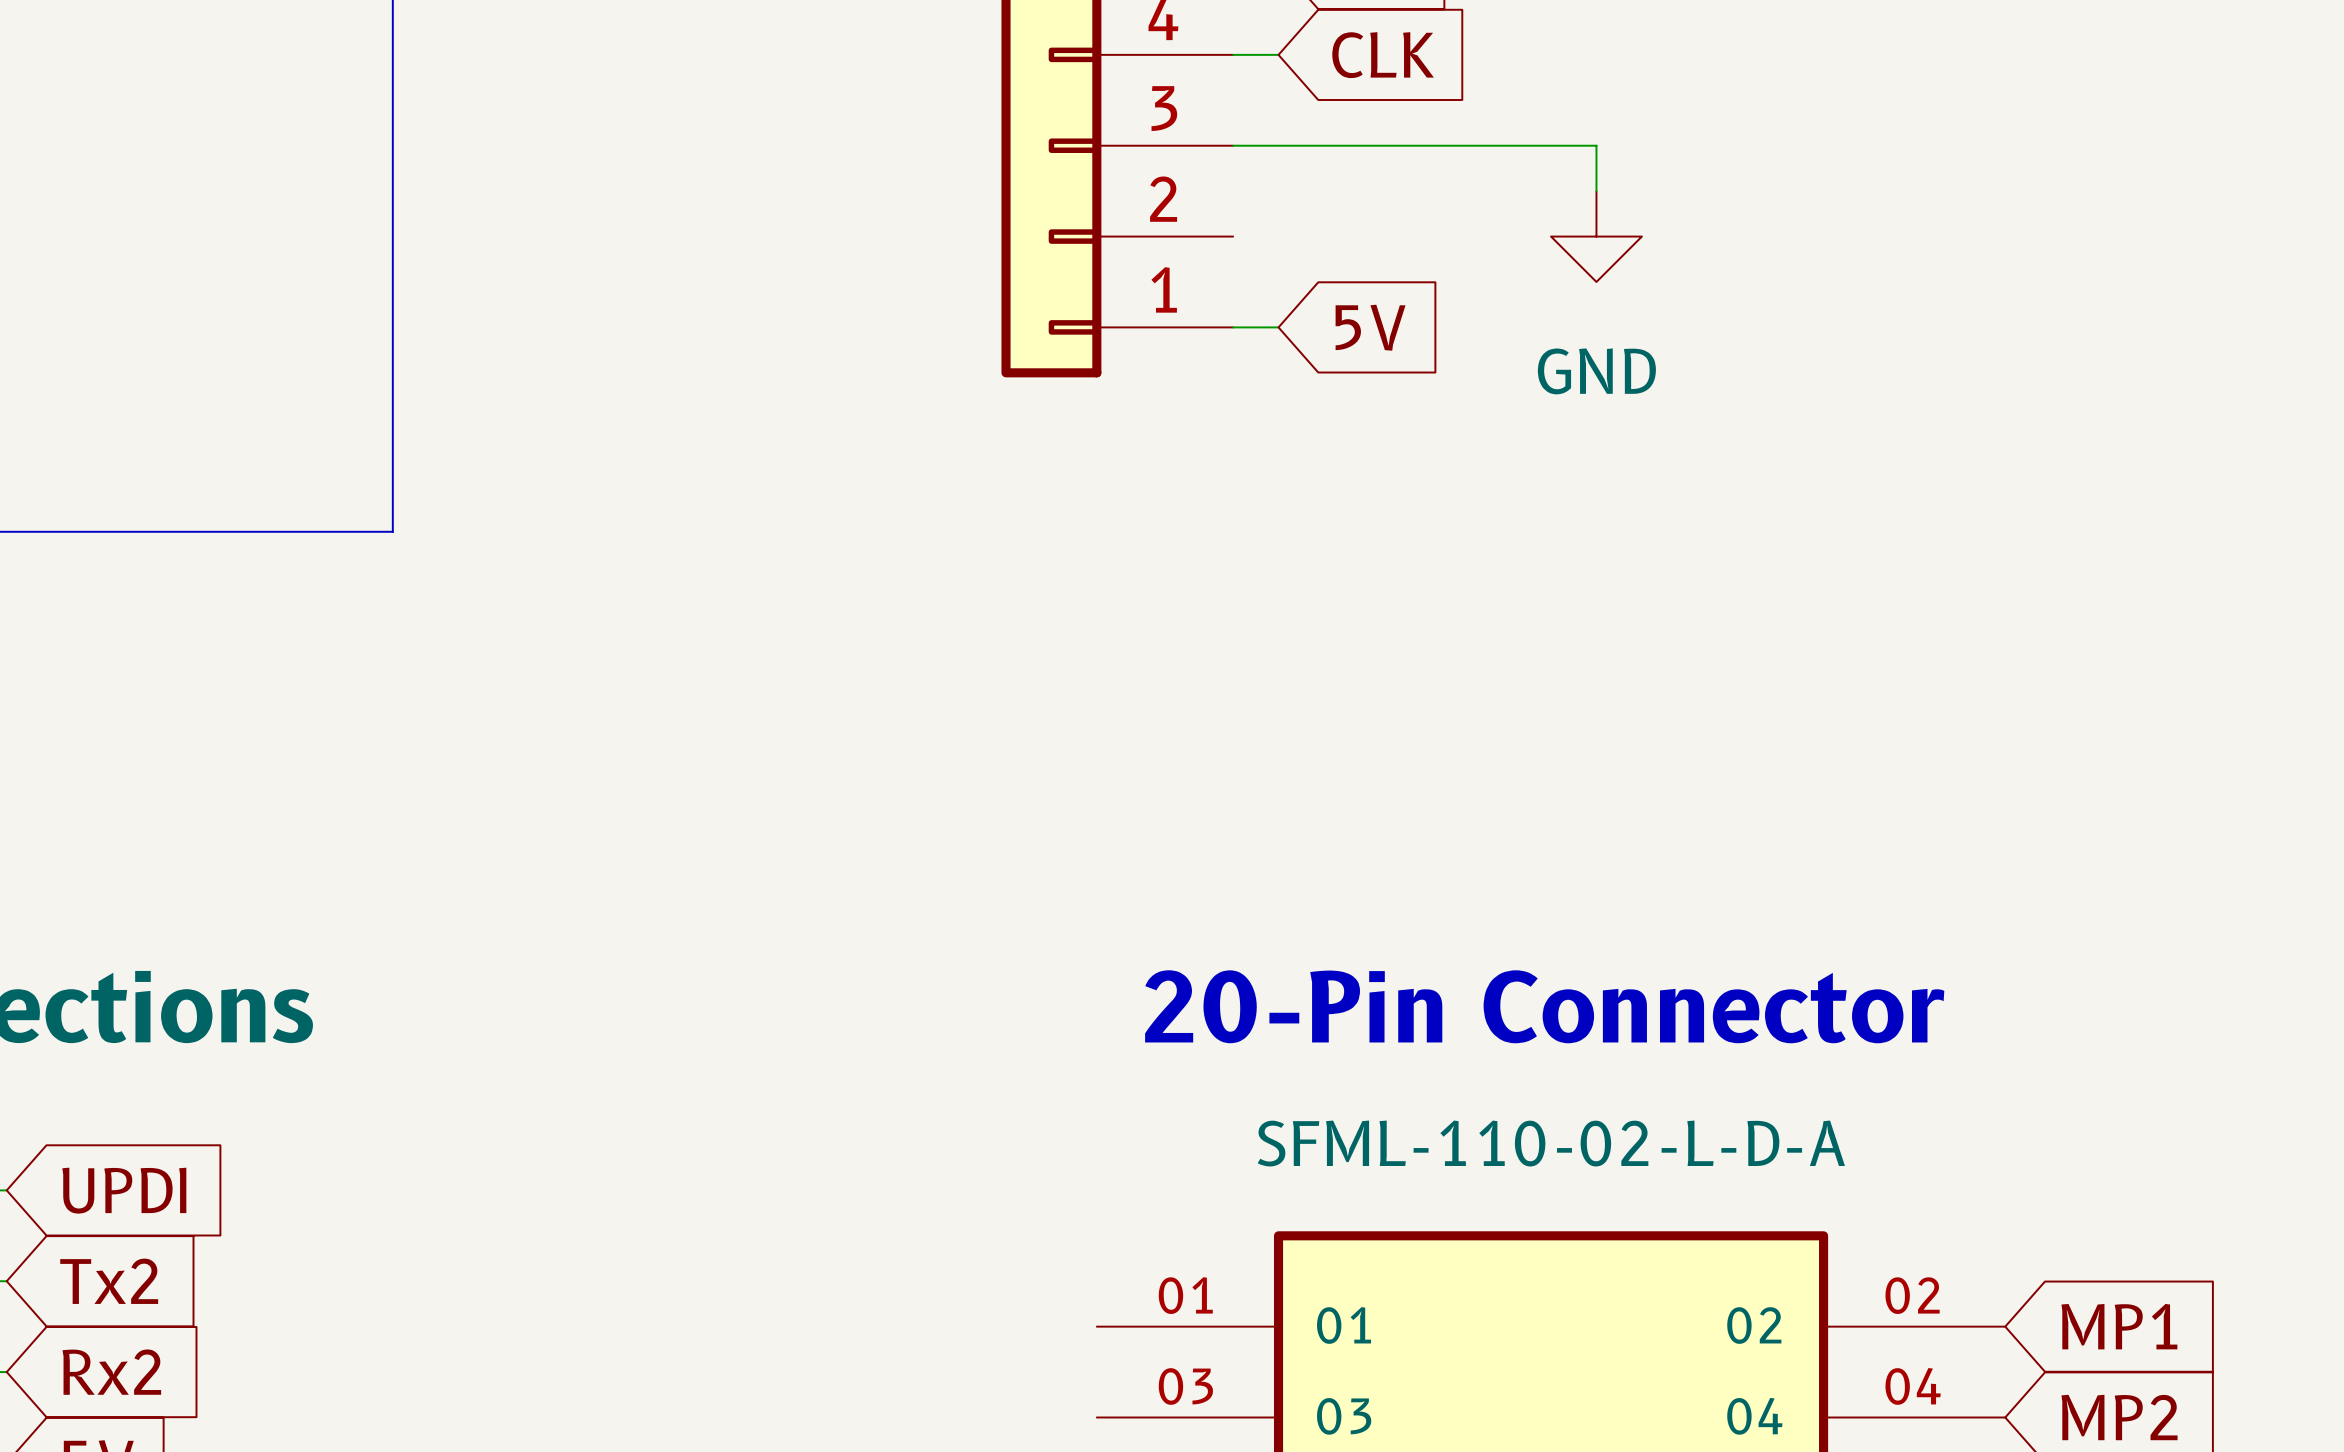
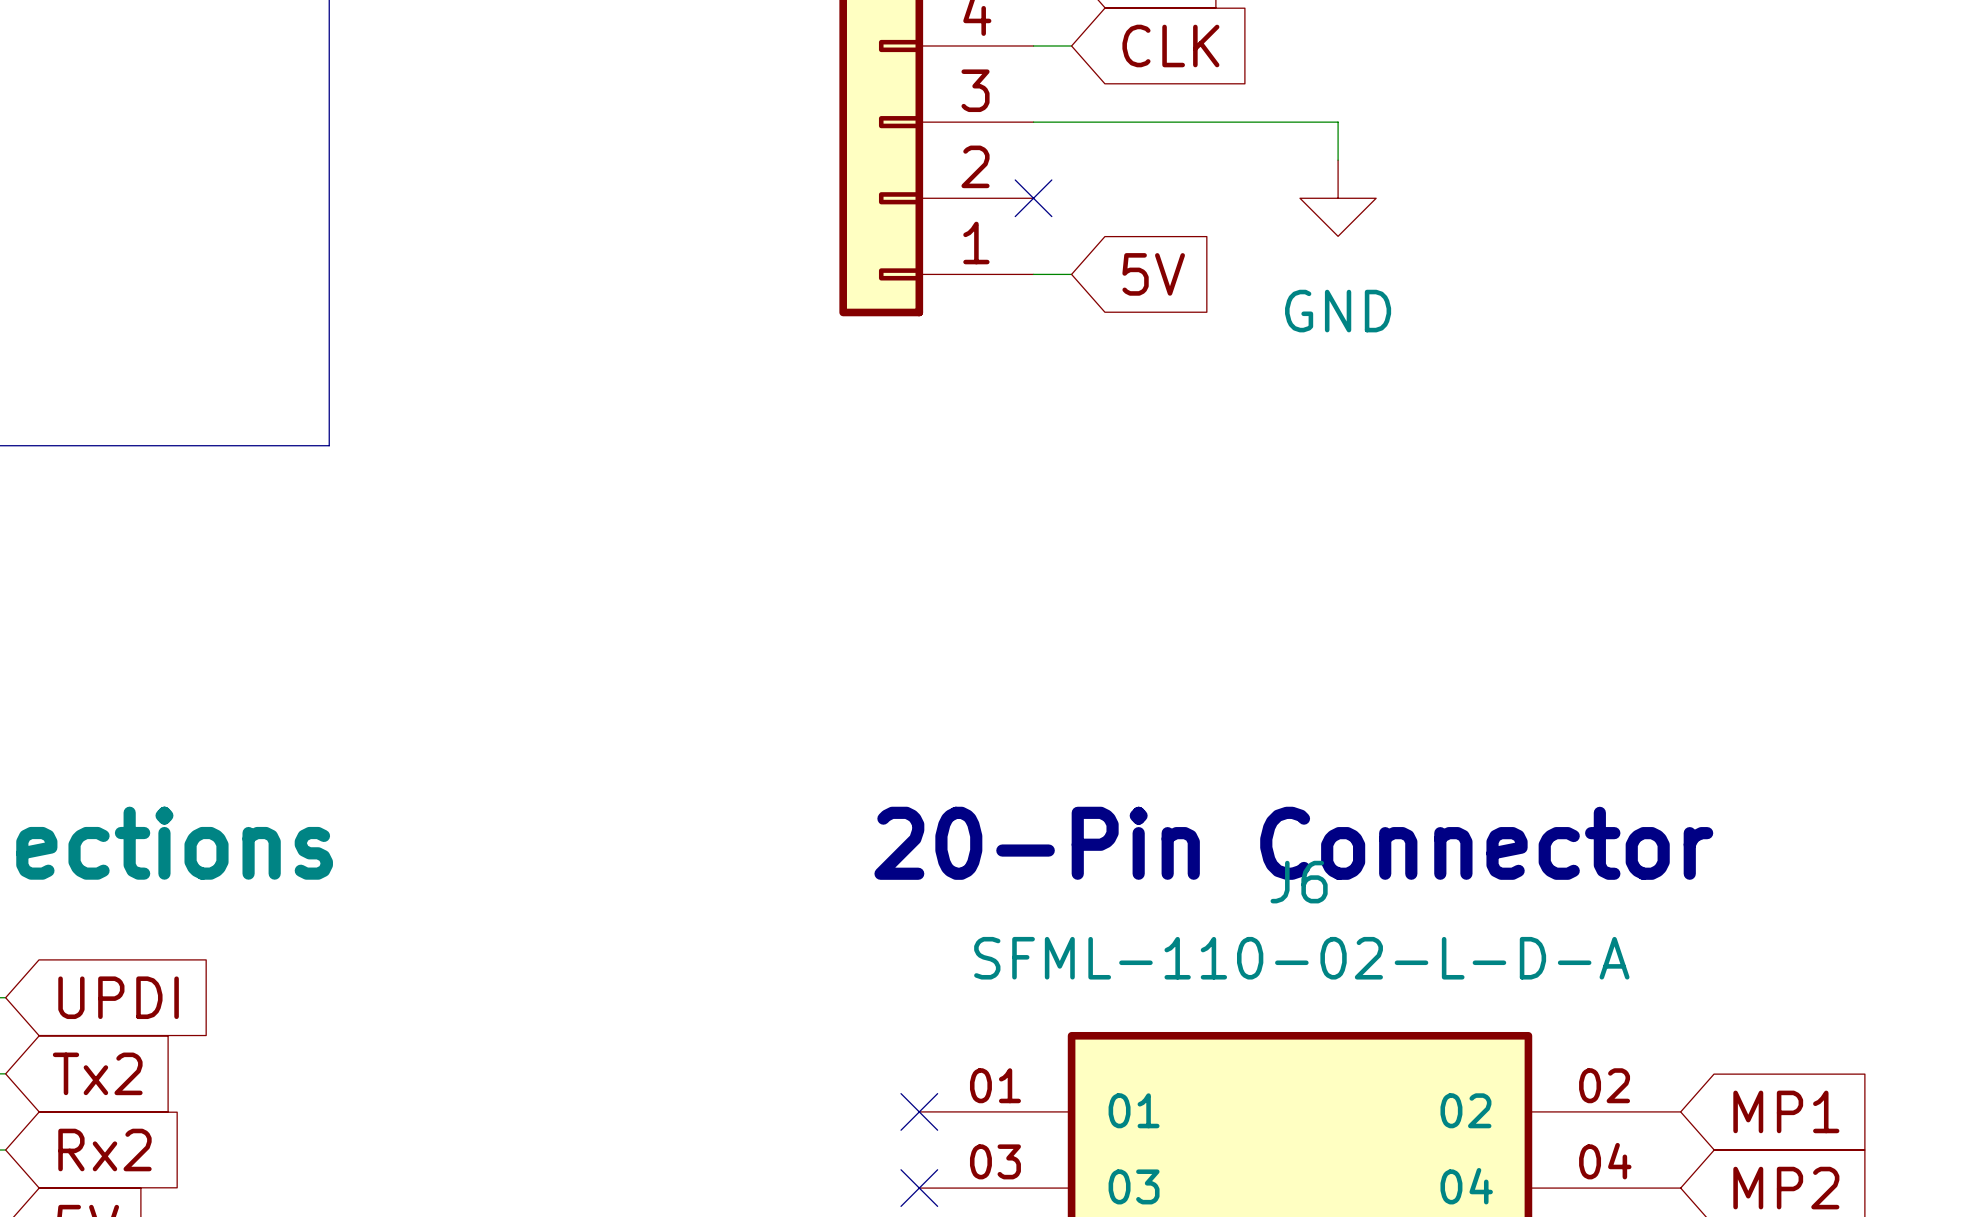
no-connect mark: none -> (1033, 198)
J6 name: none -> J6 (1299, 882)
no-connect mark: none -> (919, 1111)
no-connect mark: none -> (919, 1188)

